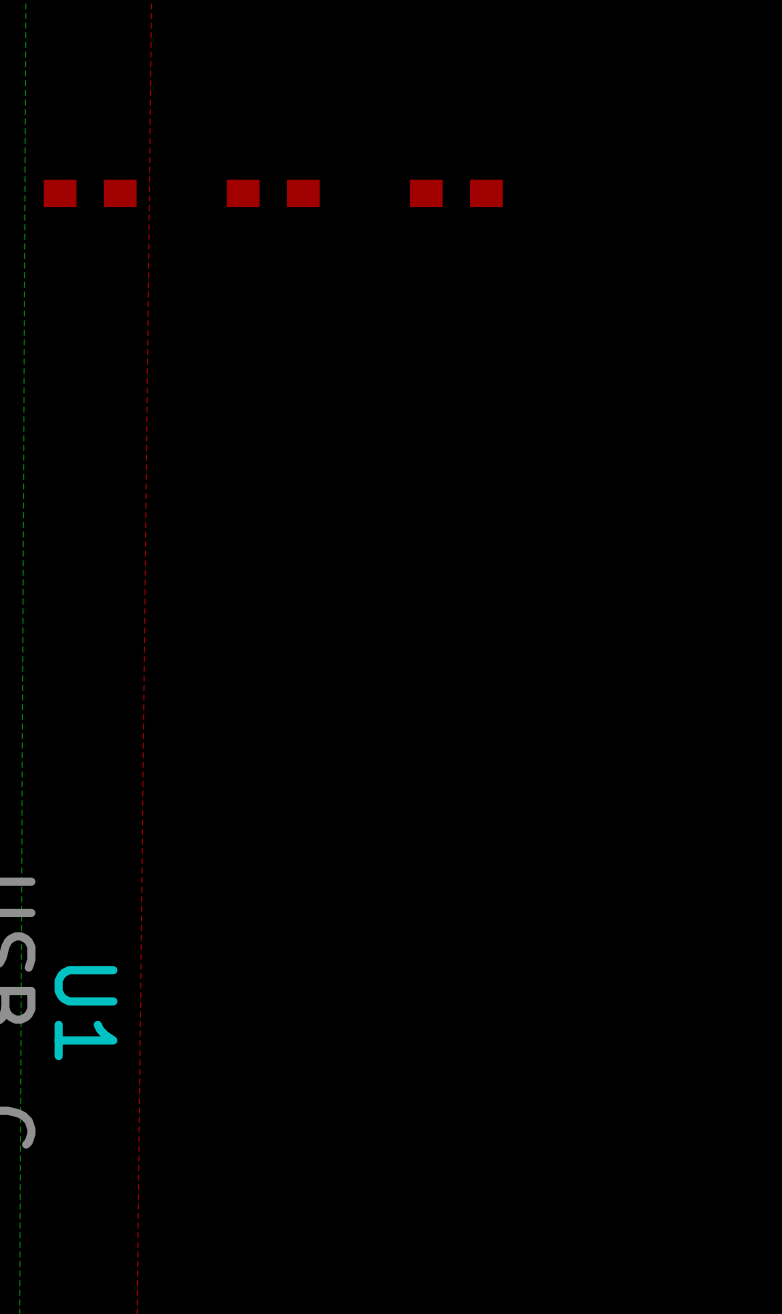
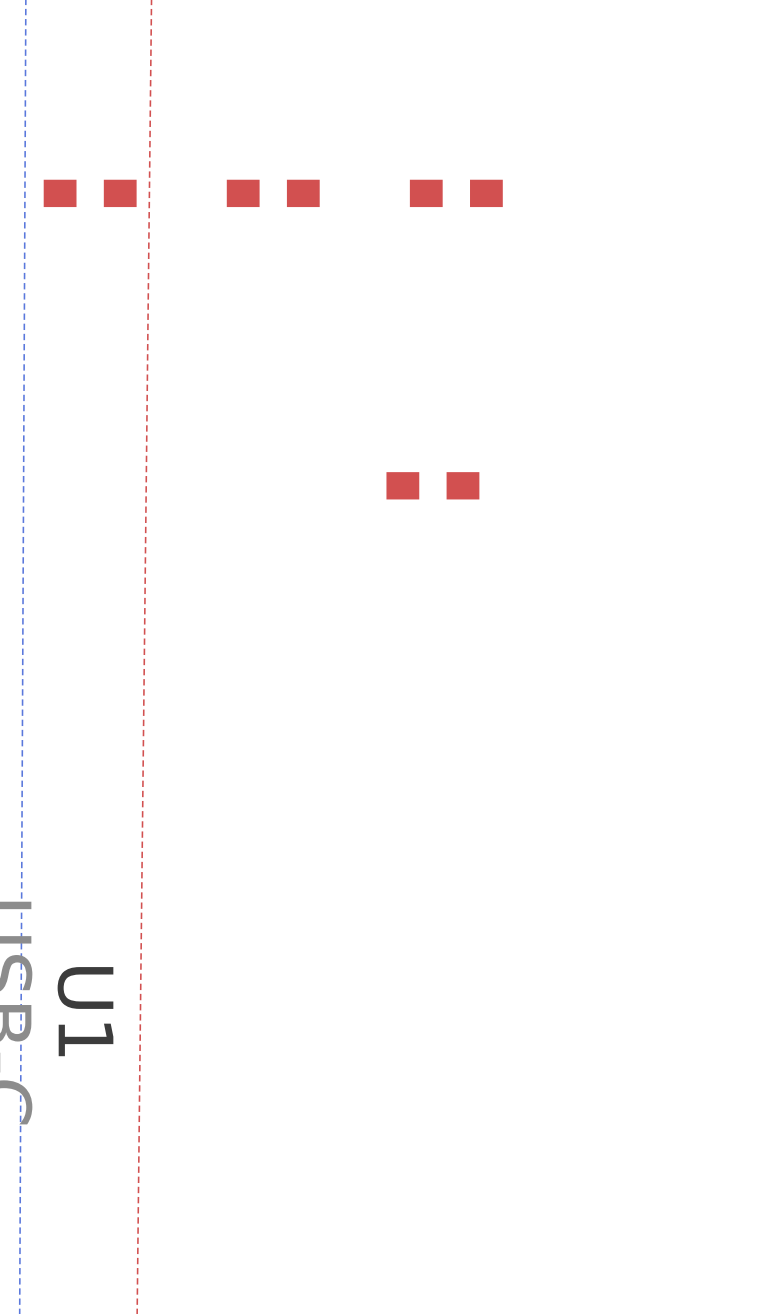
part: none -> (432, 485)

